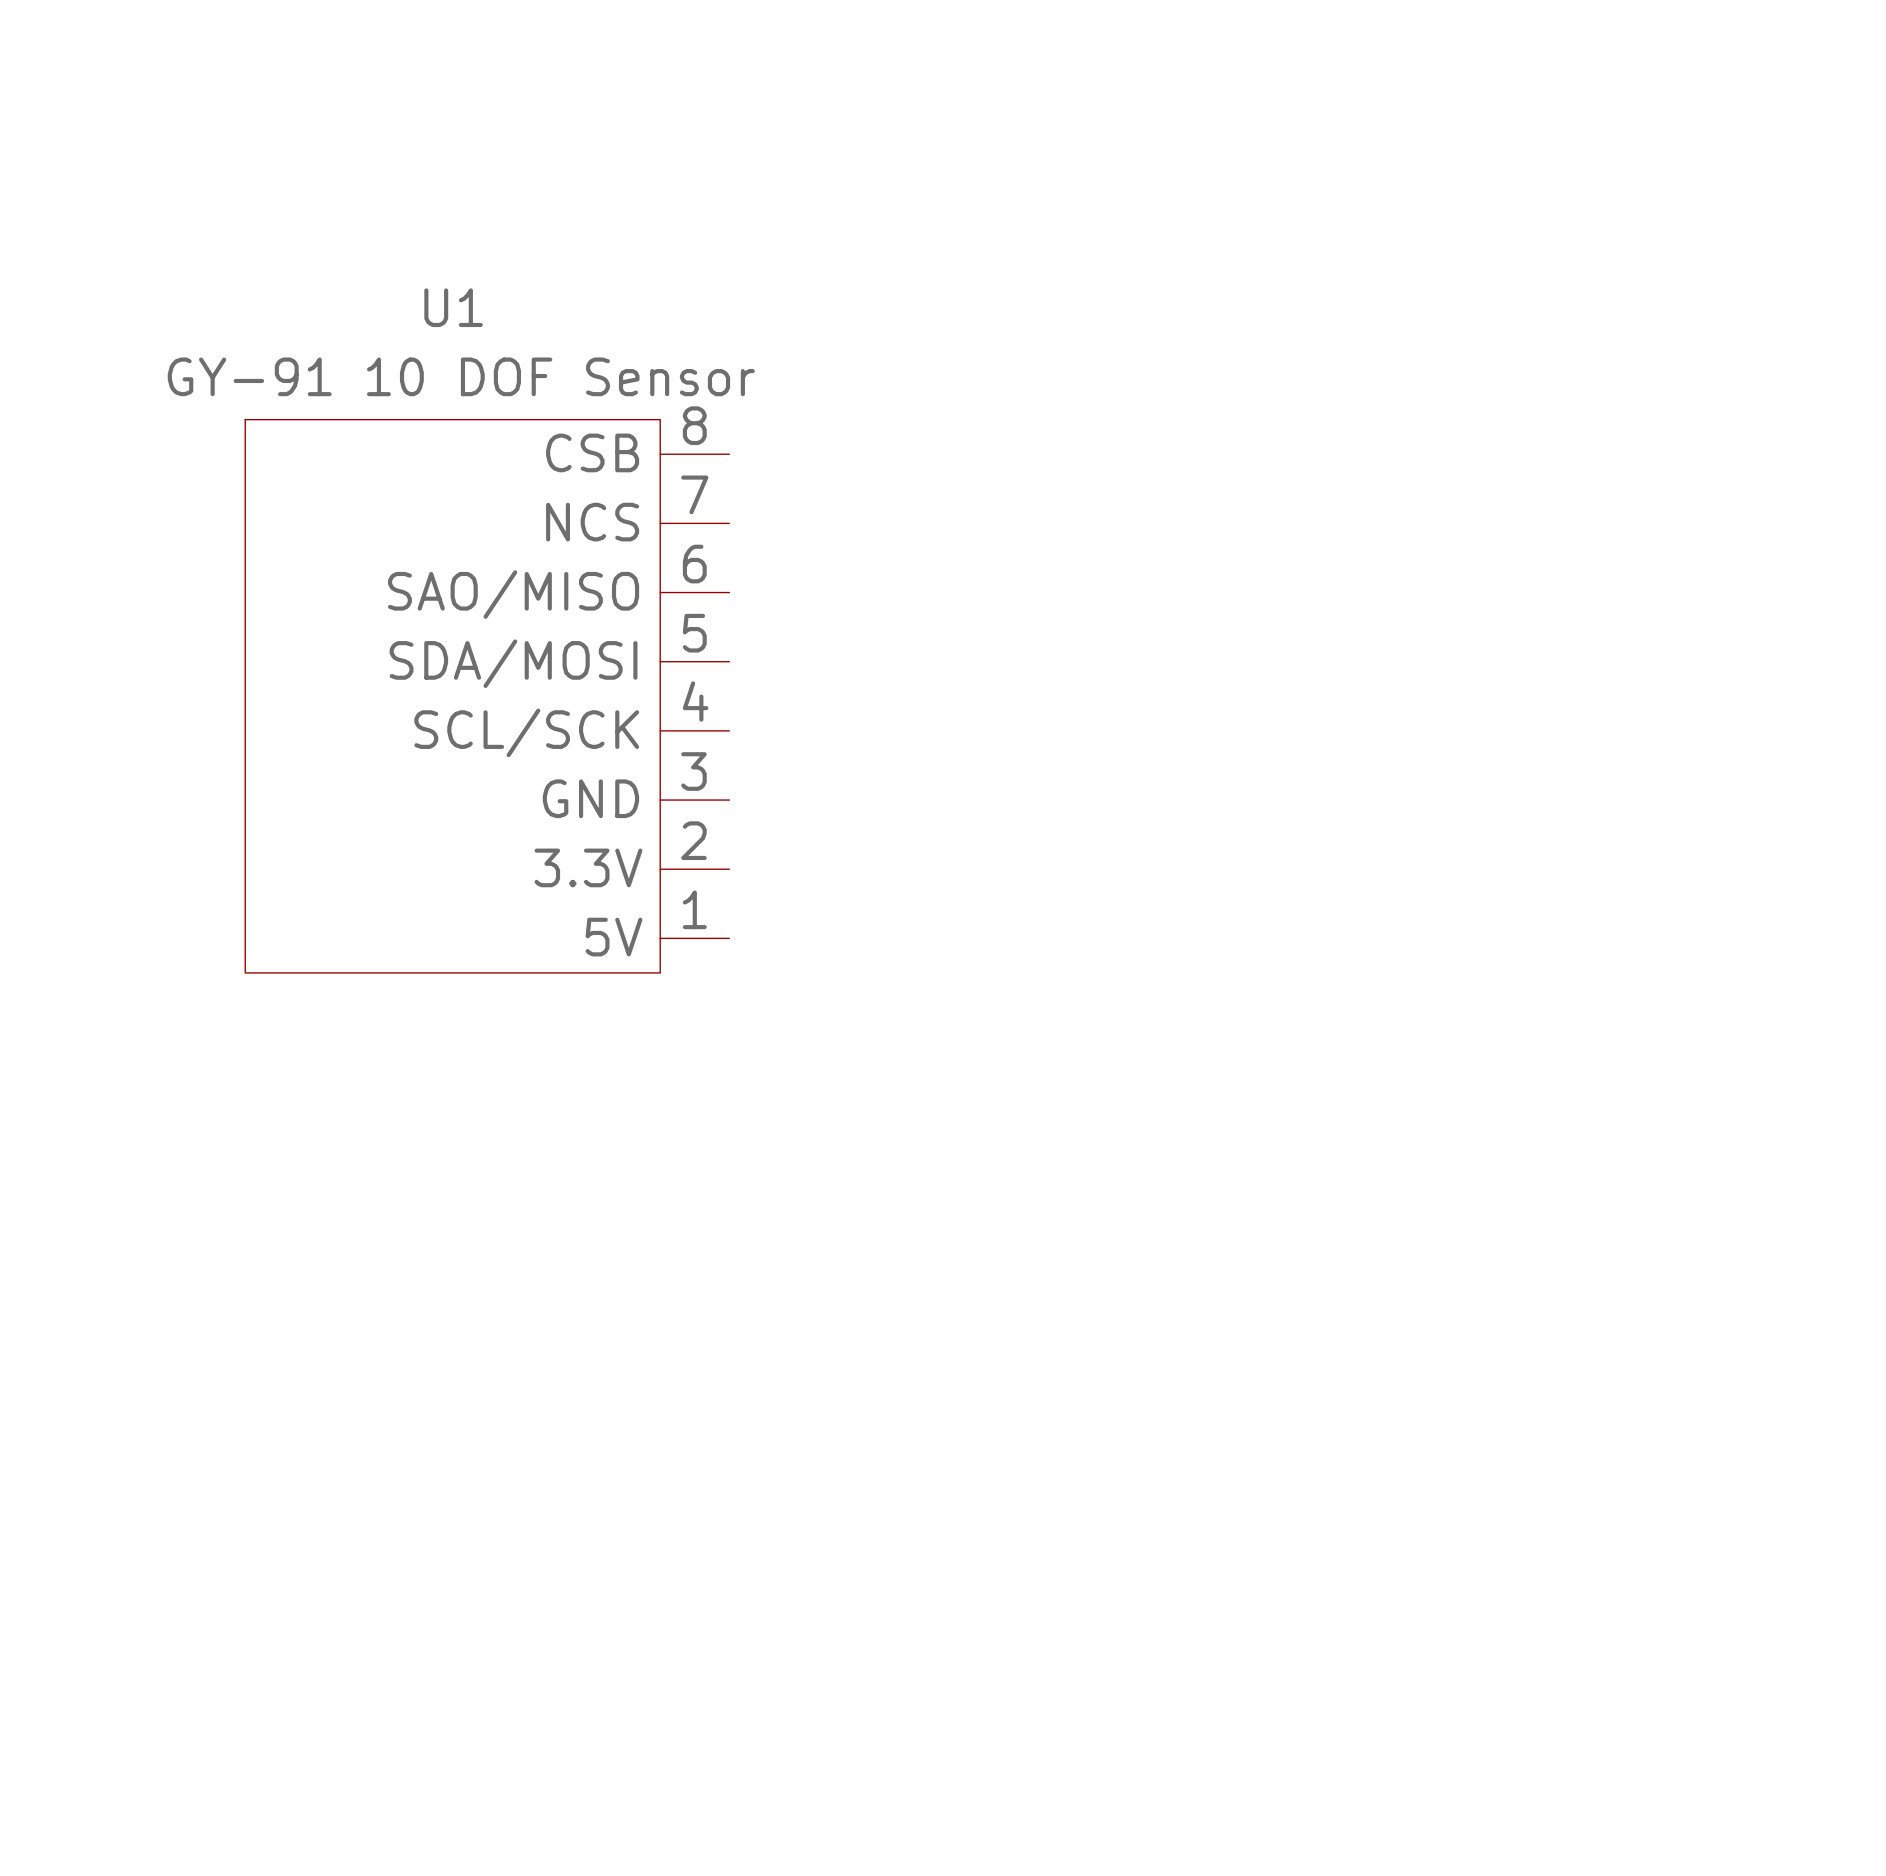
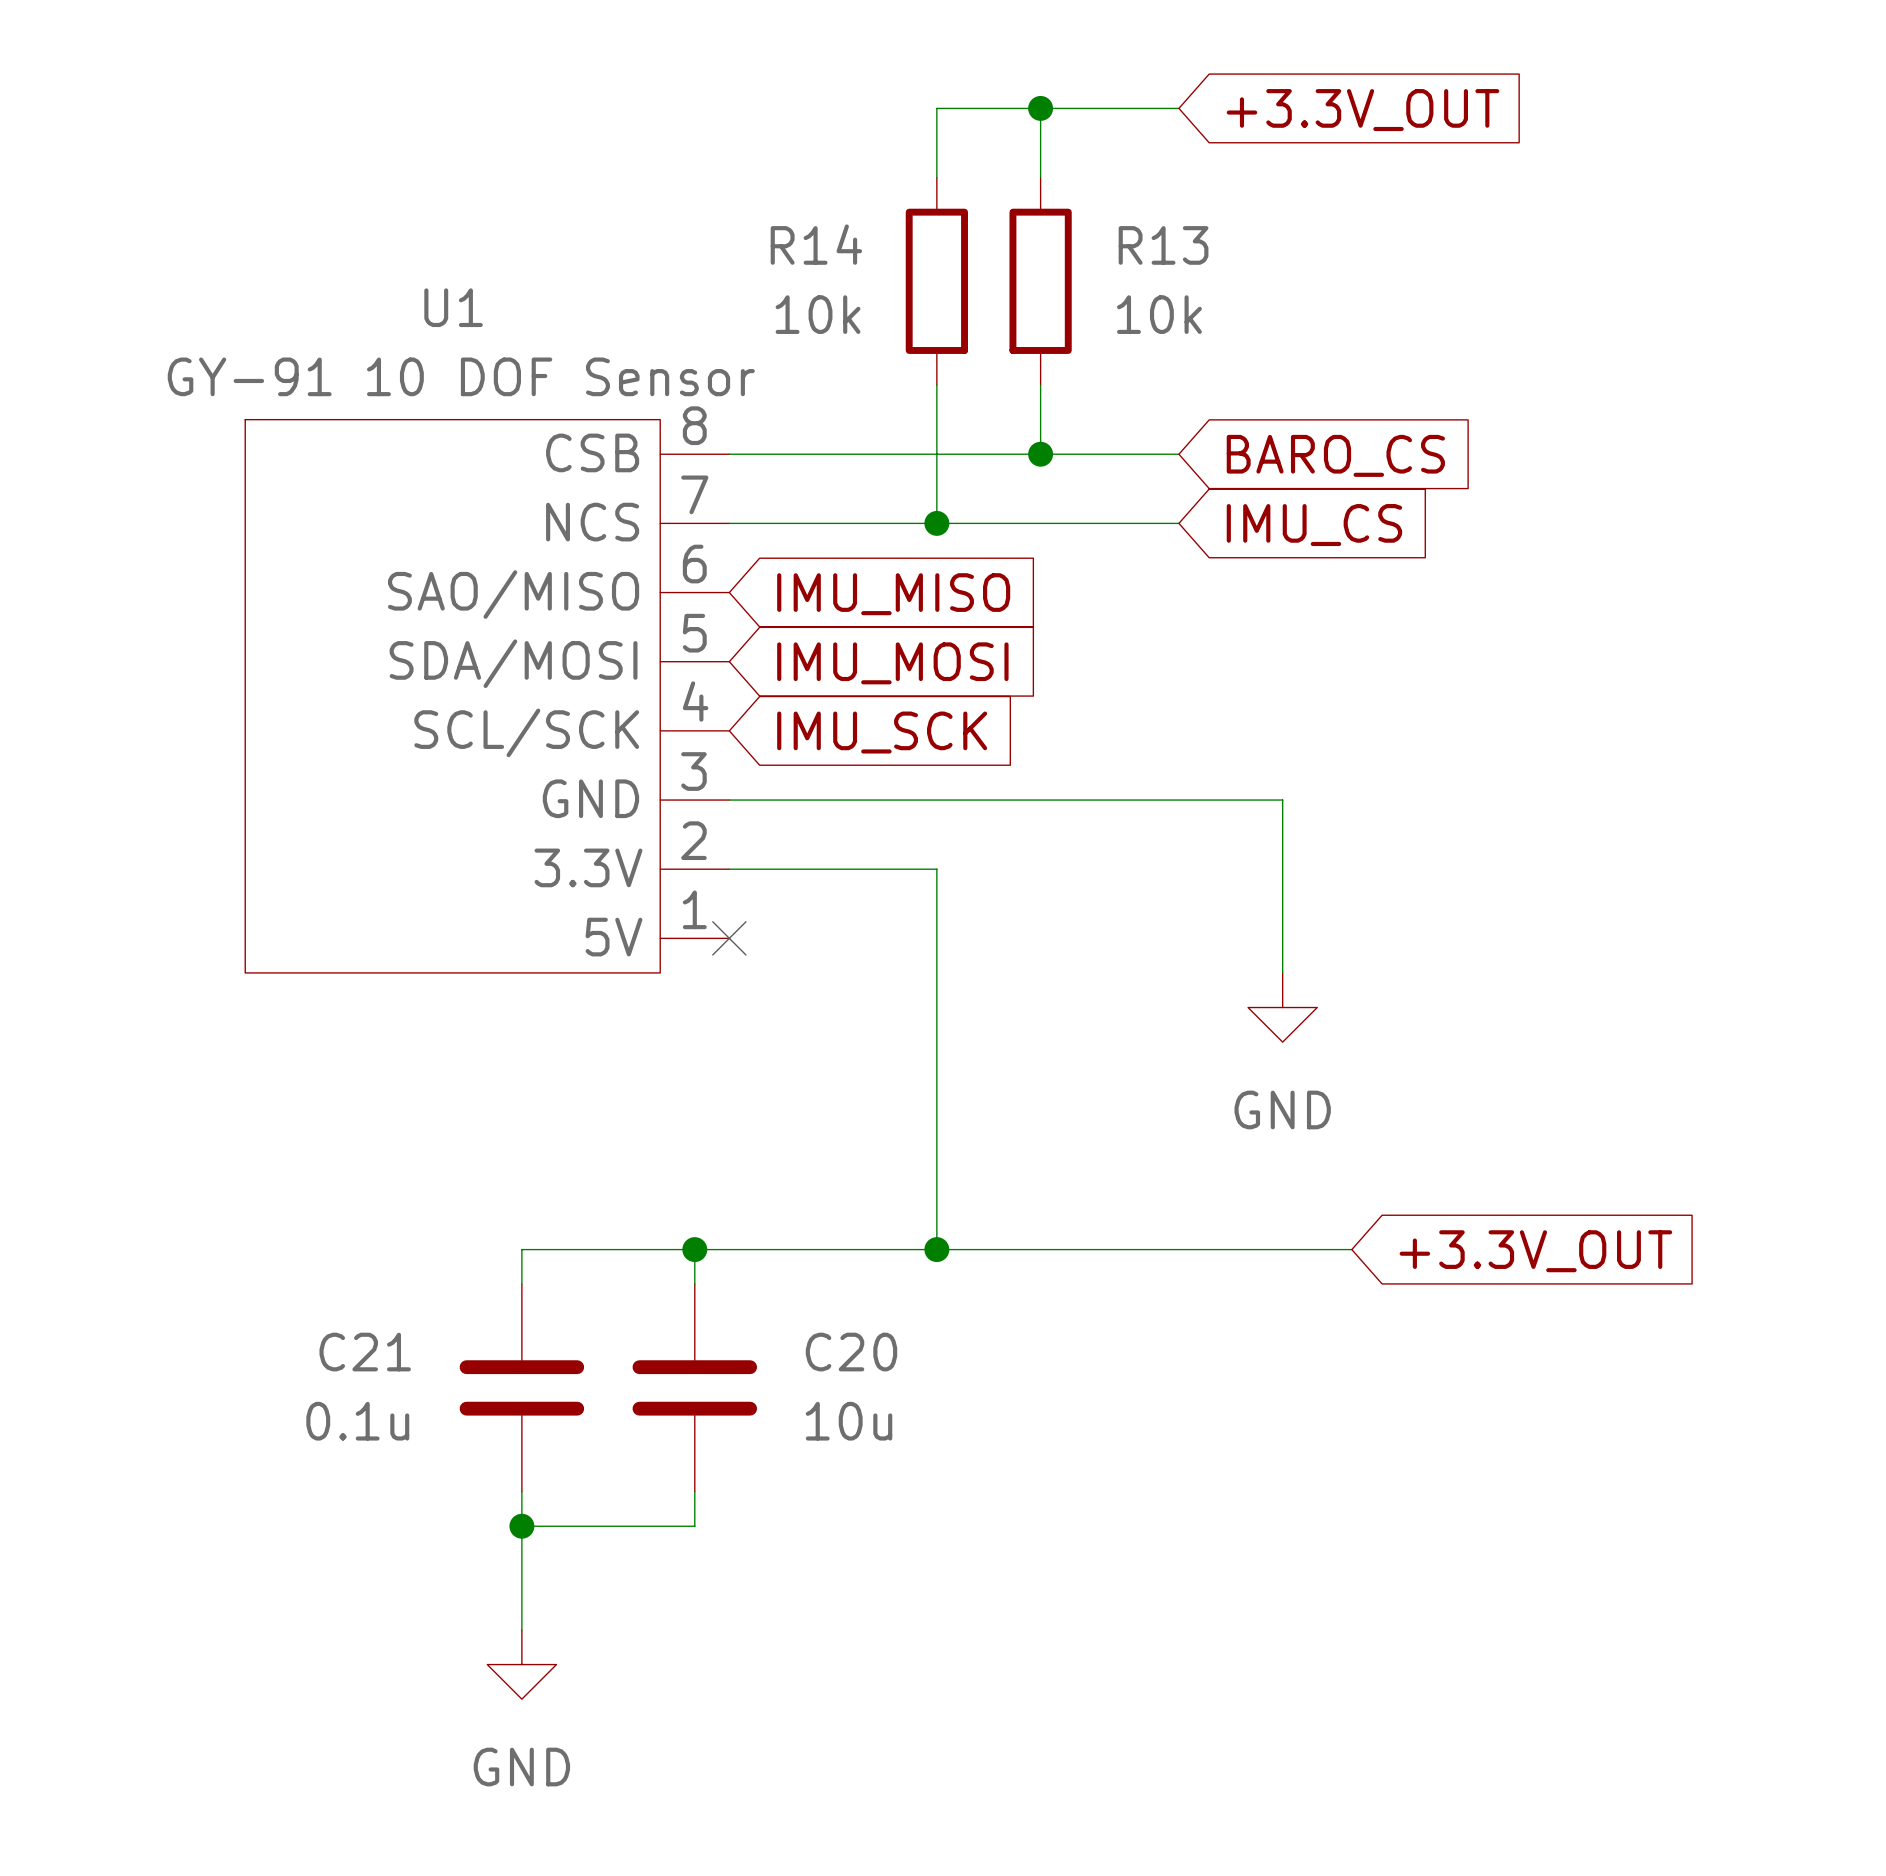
wire: none -> (1040, 108) (1040, 177)
junction: none -> (1040, 108)
wire: none -> (1178, 108) (936, 108) (936, 177)
global label: none -> +3.3V_OUT (1363, 110)
R14: none -> 10k (936, 281)
R13: none -> 10k (1040, 281)
wire: none -> (936, 385) (936, 523)
wire: none -> (1040, 385) (1040, 454)
wire: none -> (729, 454) (1178, 454)
junction: none -> (1040, 454)
global label: none -> BARO_CS (1335, 455)
wire: none -> (729, 523) (1178, 523)
junction: none -> (936, 523)
global label: none -> IMU_CS (1314, 525)
global label: none -> IMU_MISO (893, 594)
global label: none -> IMU_MOSI (892, 663)
global label: none -> IMU_SCK (882, 732)
wire: none -> (729, 800) (1282, 800) (1282, 972)
wire: none -> (729, 869) (936, 869) (936, 1249)
no-connect mark: none -> (729, 938)
power symbol: none -> GND (1282, 1007)
wire: none -> (694, 1249) (694, 1284)
junction: none -> (694, 1249)
junction: none -> (936, 1249)
wire: none -> (1351, 1249) (521, 1249) (521, 1284)
global label: none -> +3.3V_OUT (1535, 1251)
C21: none -> 0.1u (521, 1387)
C20: none -> 10u (694, 1387)
wire: none -> (521, 1491) (521, 1629)
wire: none -> (694, 1491) (694, 1526) (521, 1526)
junction: none -> (521, 1526)
power symbol: none -> GND (521, 1664)

